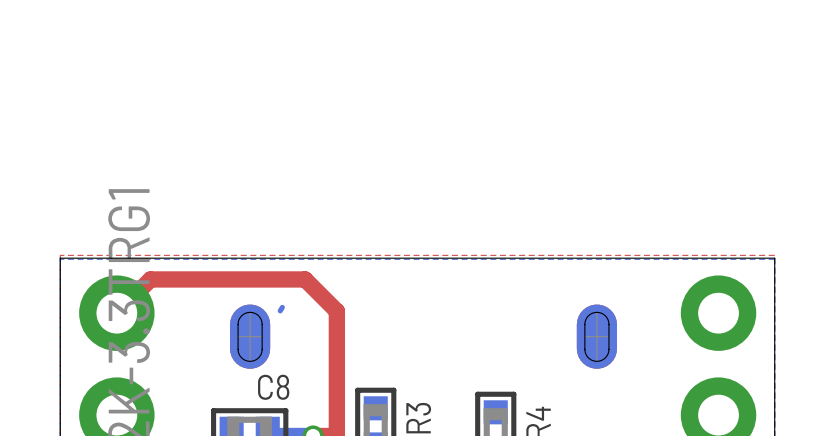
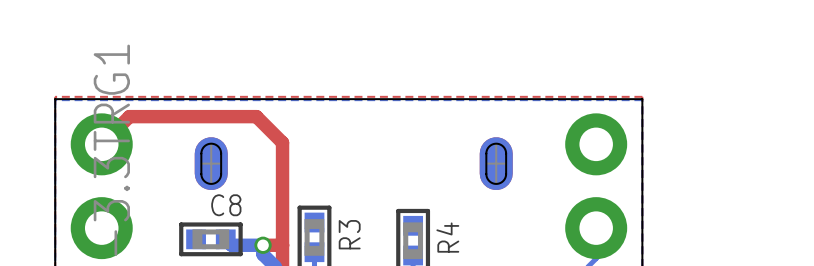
bottom track: (282, 307) (280, 310) -> none

